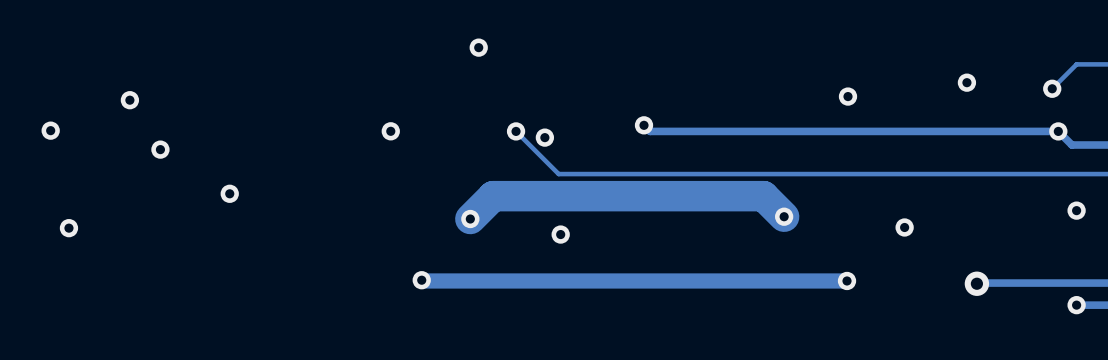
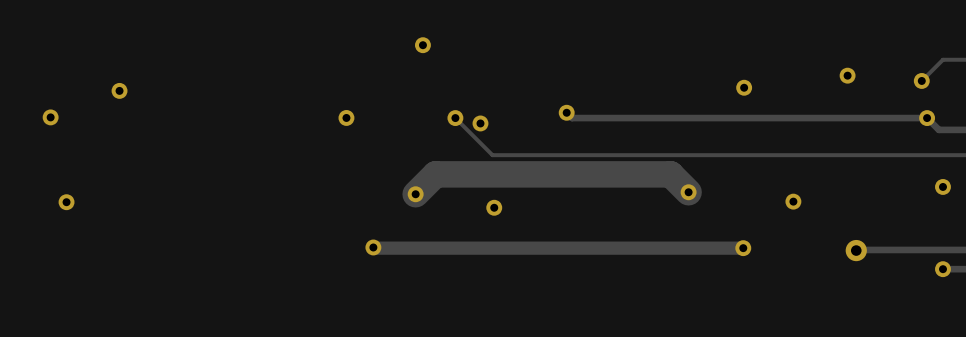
via: (160, 149) -> none
via: (229, 193) -> none

